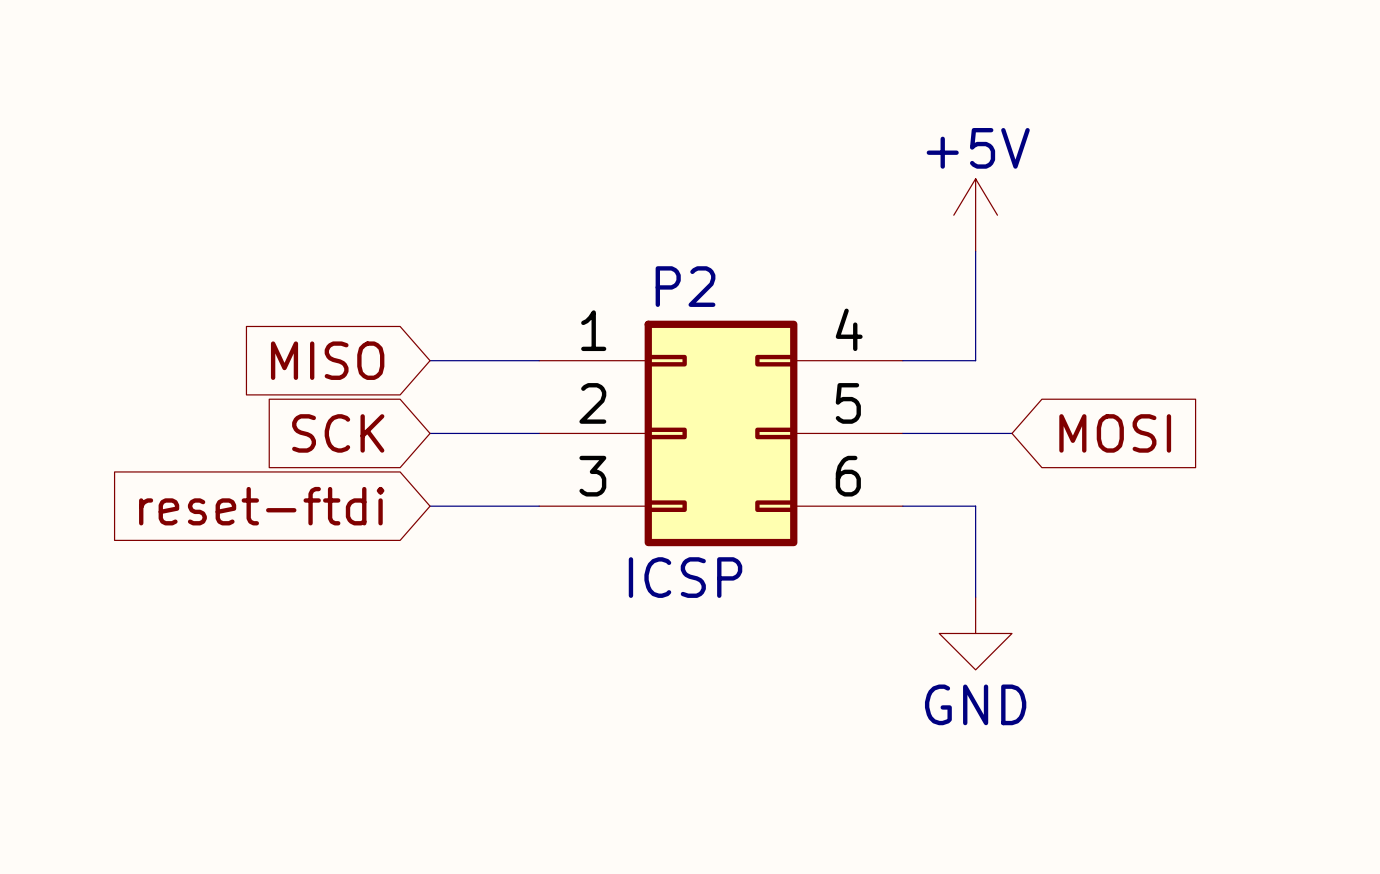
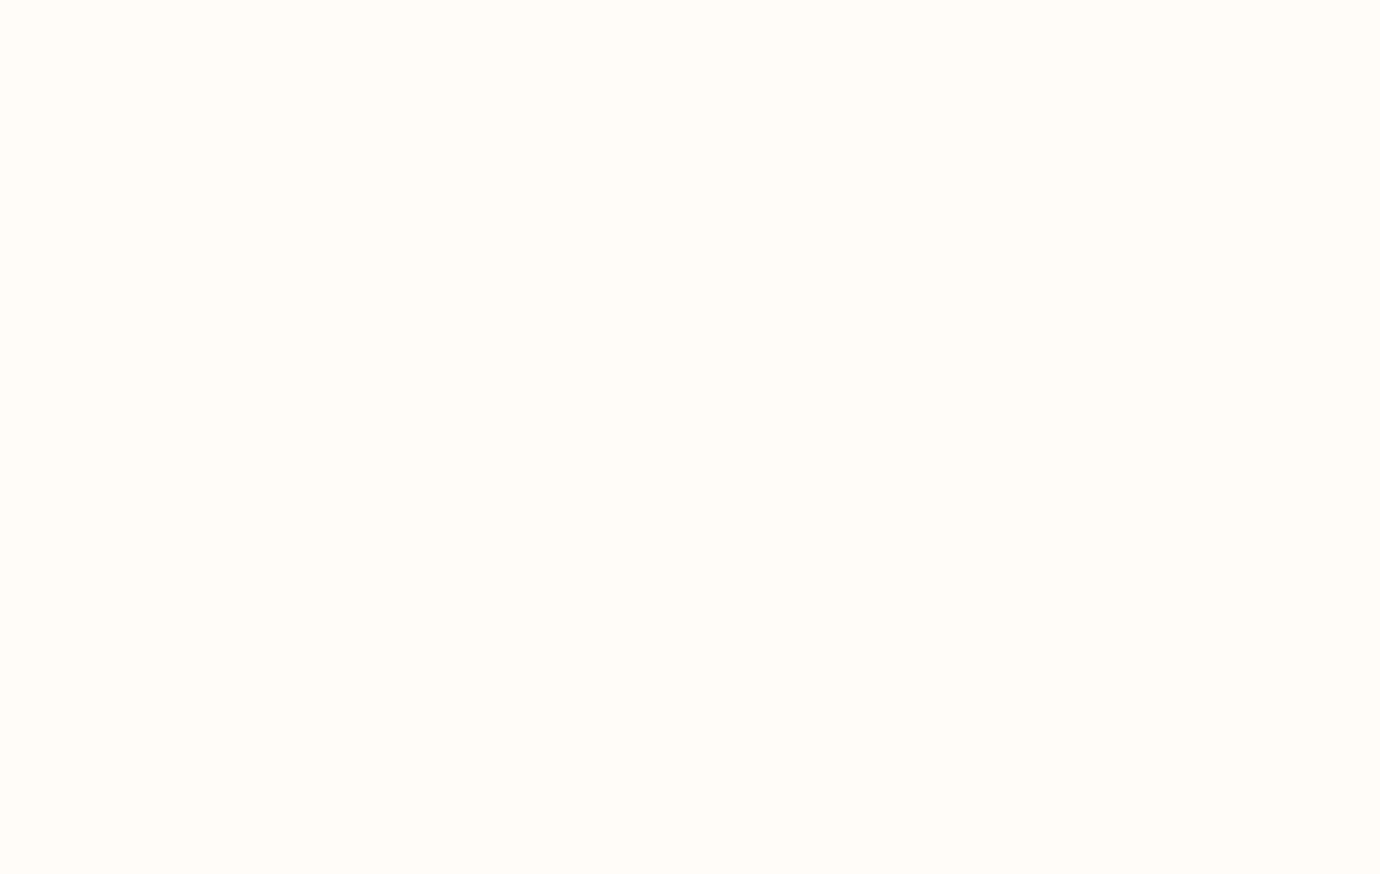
power symbol: +5V (975, 215) -> none
wire: (975, 251) (975, 360) (902, 360) -> none
global label: MISO (327, 360) -> none
wire: (430, 360) (539, 360) -> none
global label: SCK (338, 433) -> none
wire: (430, 433) (539, 433) -> none
P2: ICSP (721, 433) -> none
wire: (902, 433) (1012, 433) -> none
global label: MOSI (1115, 433) -> none
global label: reset-ftdi (261, 506) -> none
wire: (430, 506) (539, 506) -> none
wire: (902, 506) (975, 506) (975, 597) -> none
power symbol: GND (975, 633) -> none

